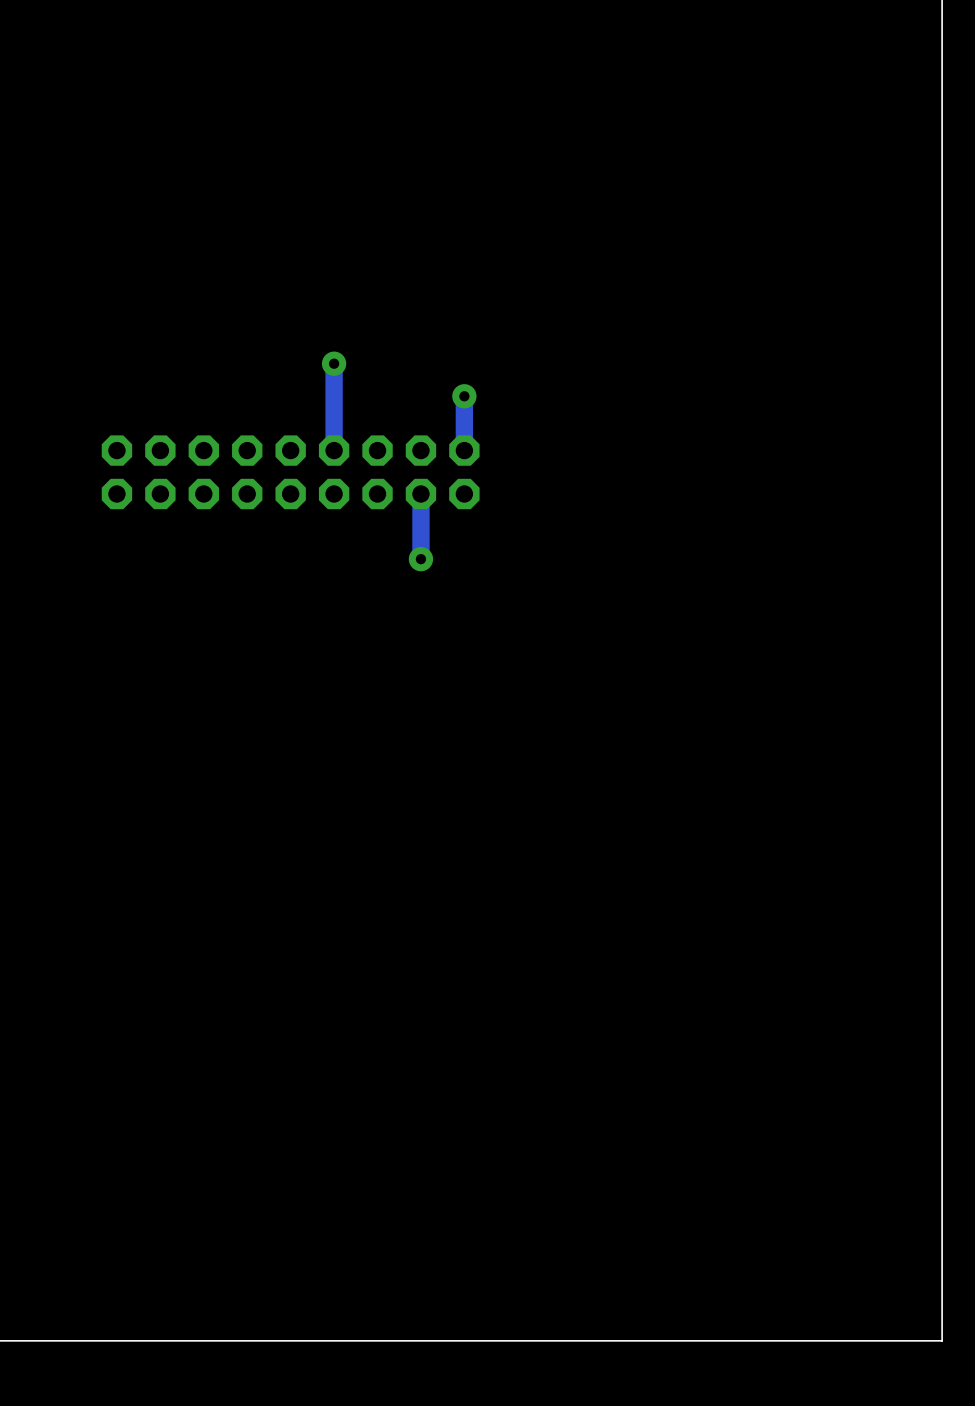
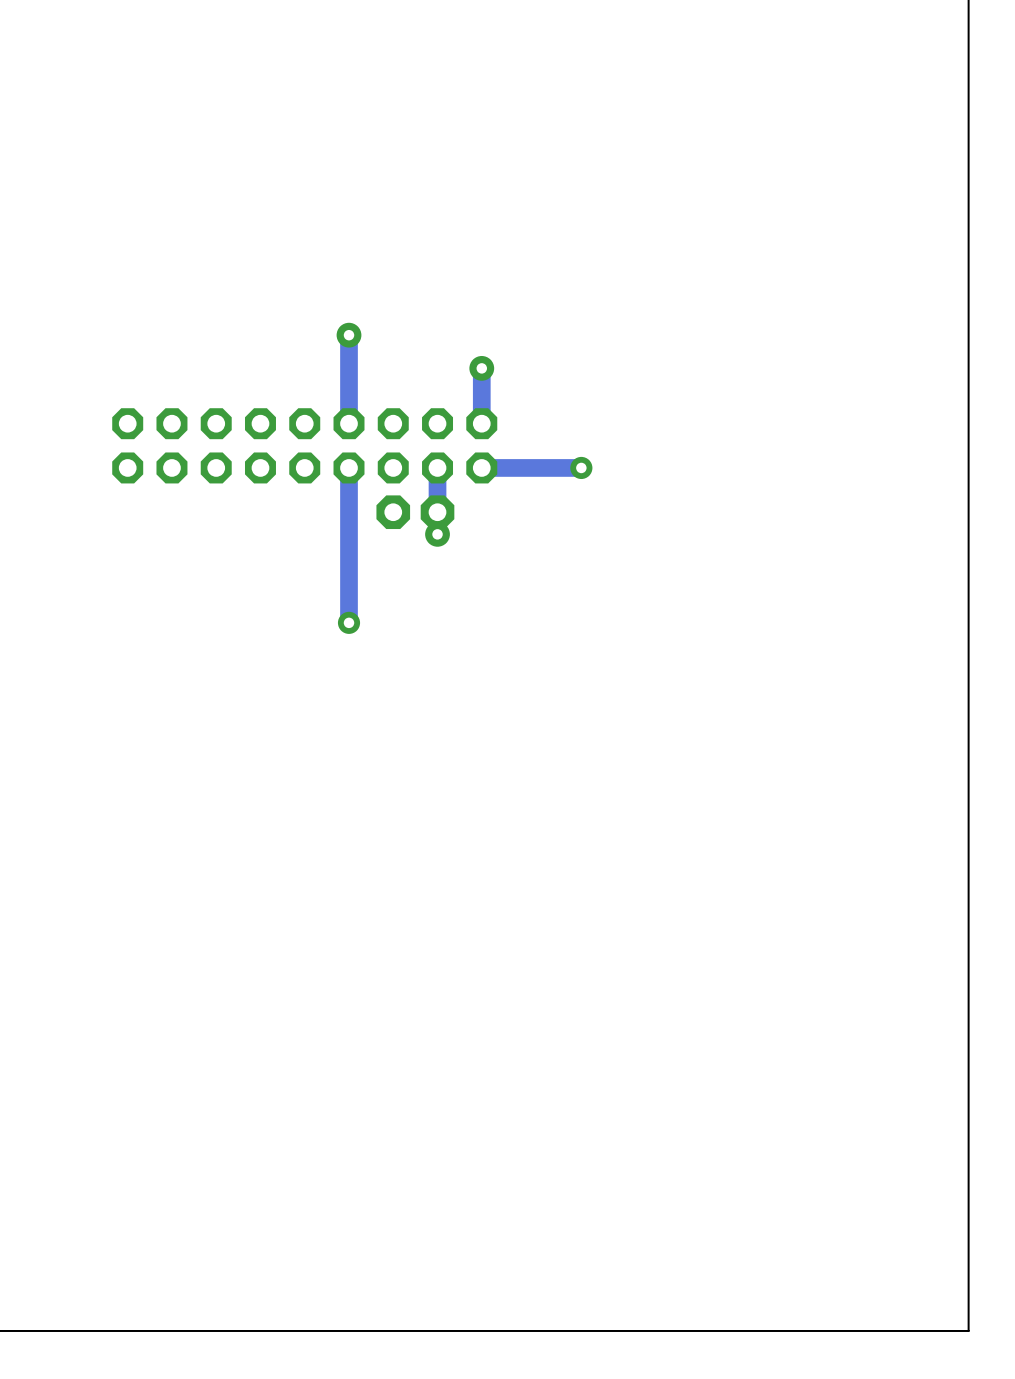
track: none -> (349, 467) (349, 622)
track: none -> (581, 467) (481, 467)
via: none -> (581, 467)
part: none -> (393, 512)
part: none -> (437, 512)
via: none -> (349, 622)

